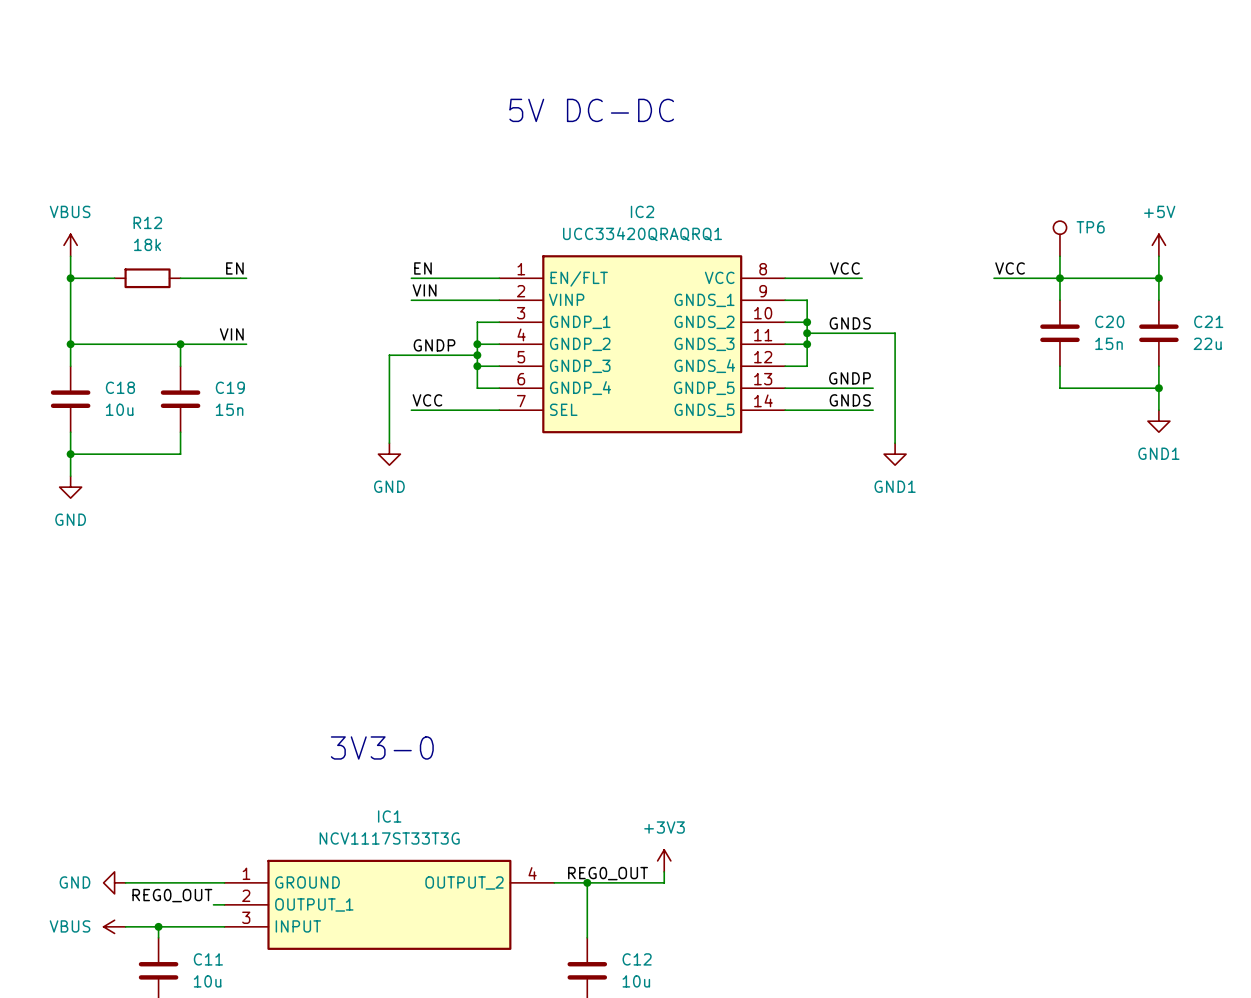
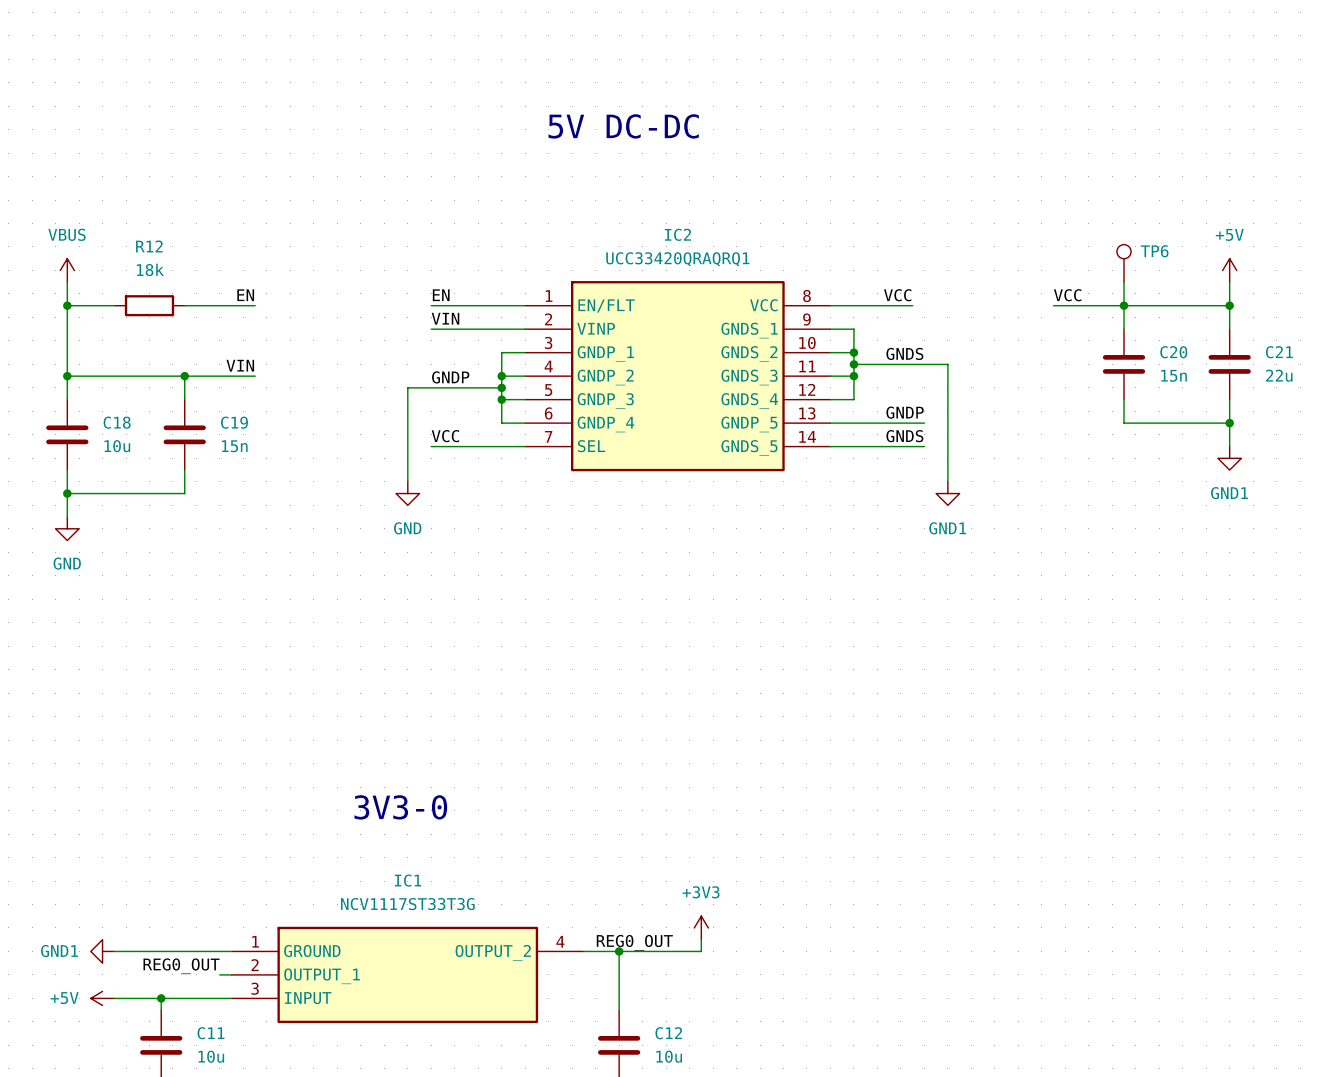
power symbol: none -> GND1 (102, 951)
power symbol: GND (114, 882) -> none
power symbol: none -> +5V (102, 998)
power symbol: VBUS (114, 926) -> none

